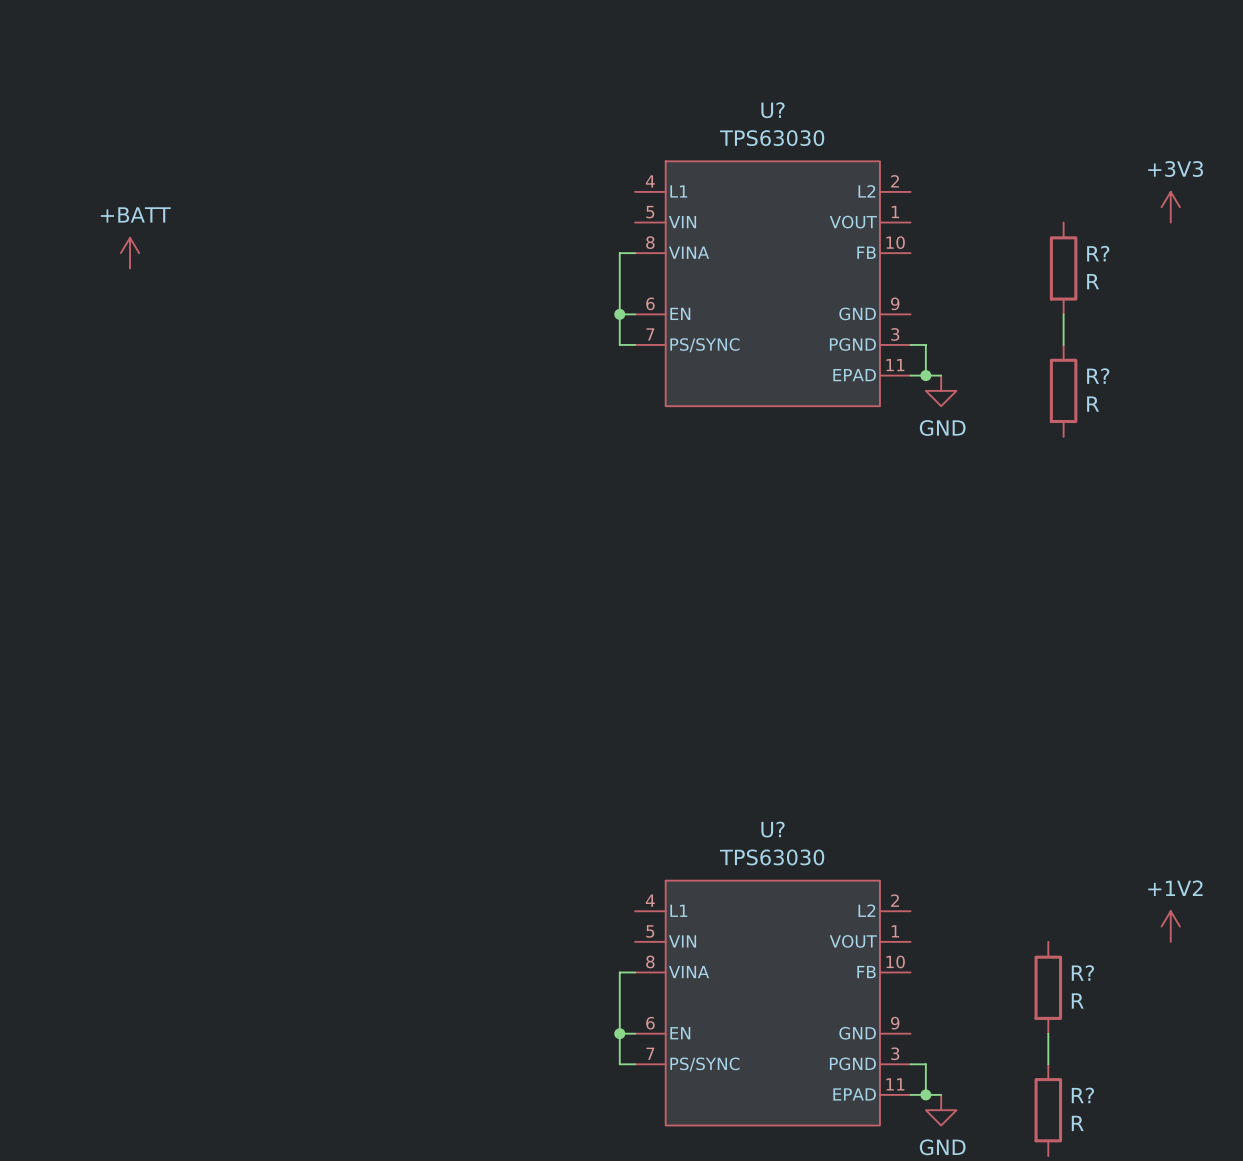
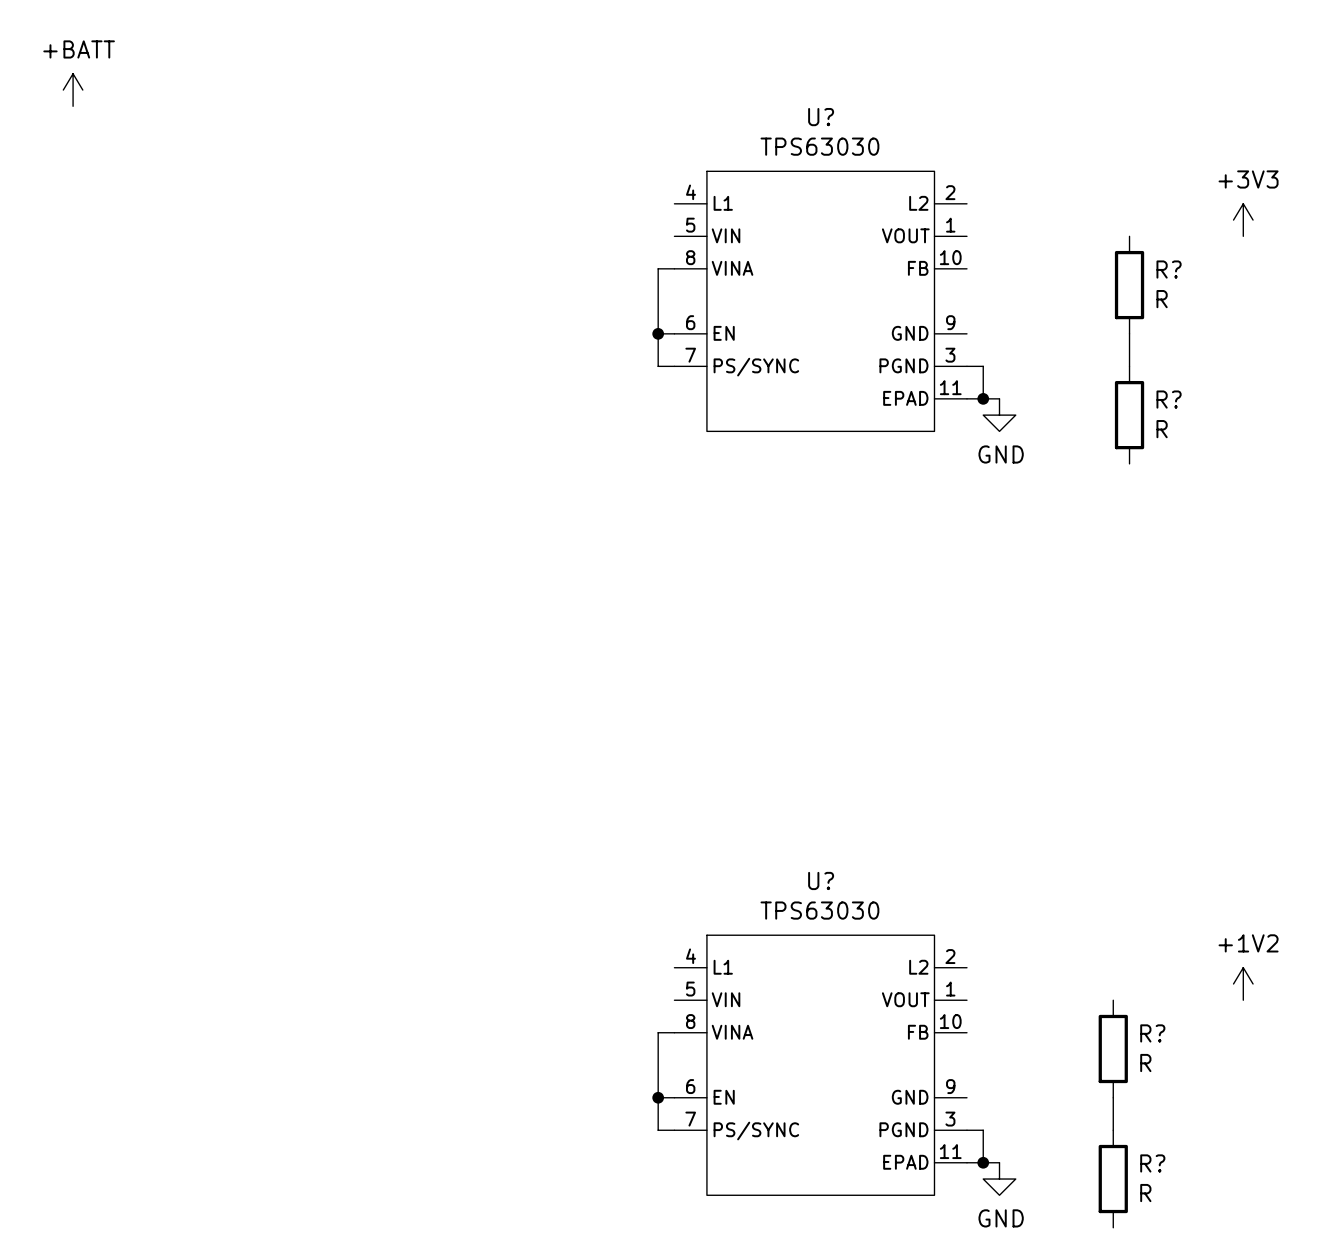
power symbol position: +BATT (130, 253) -> +BATT (73, 90)

